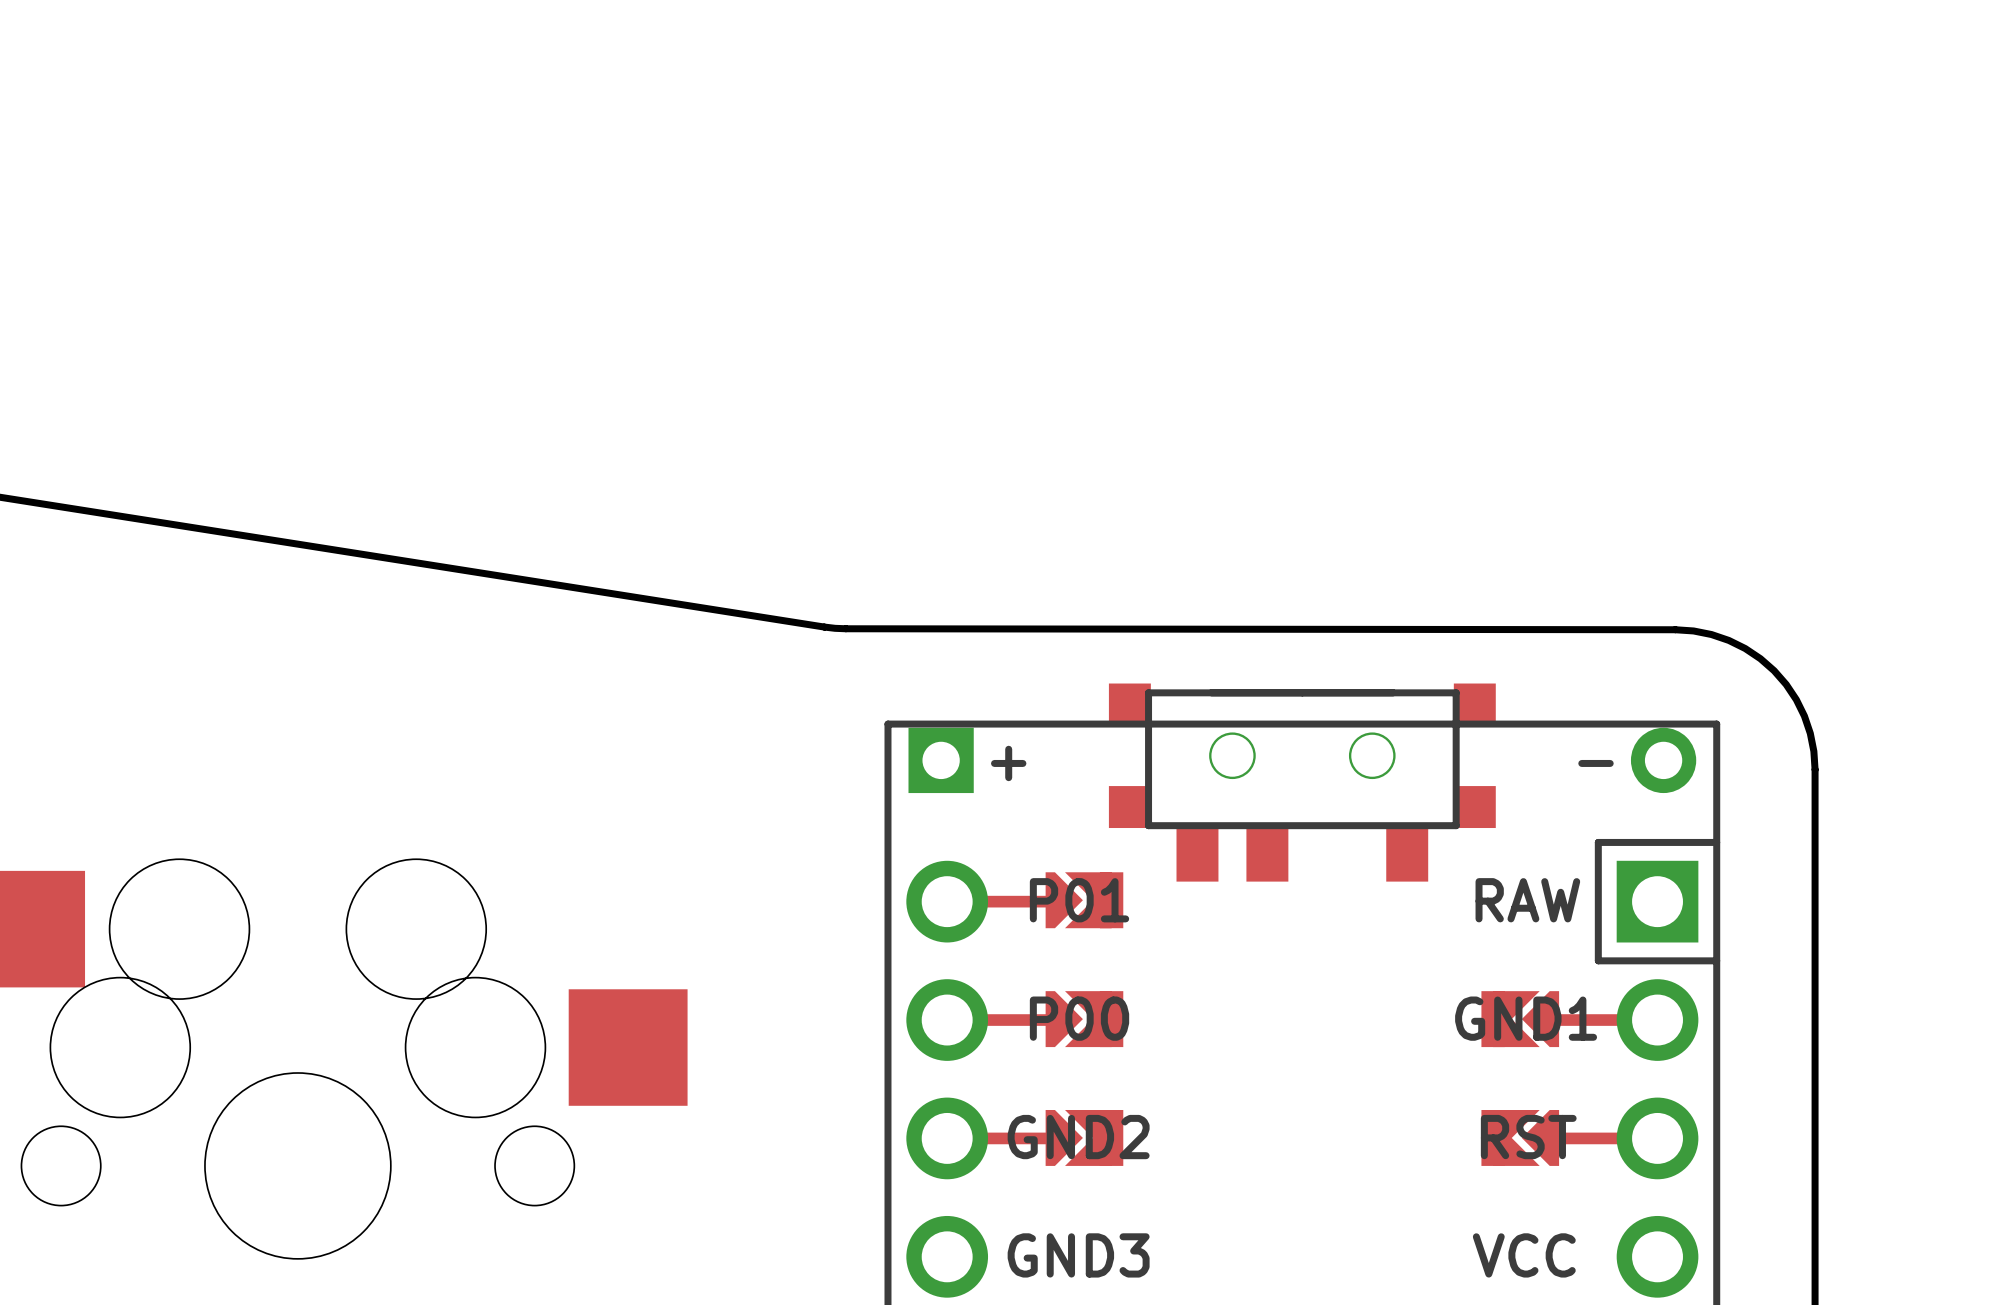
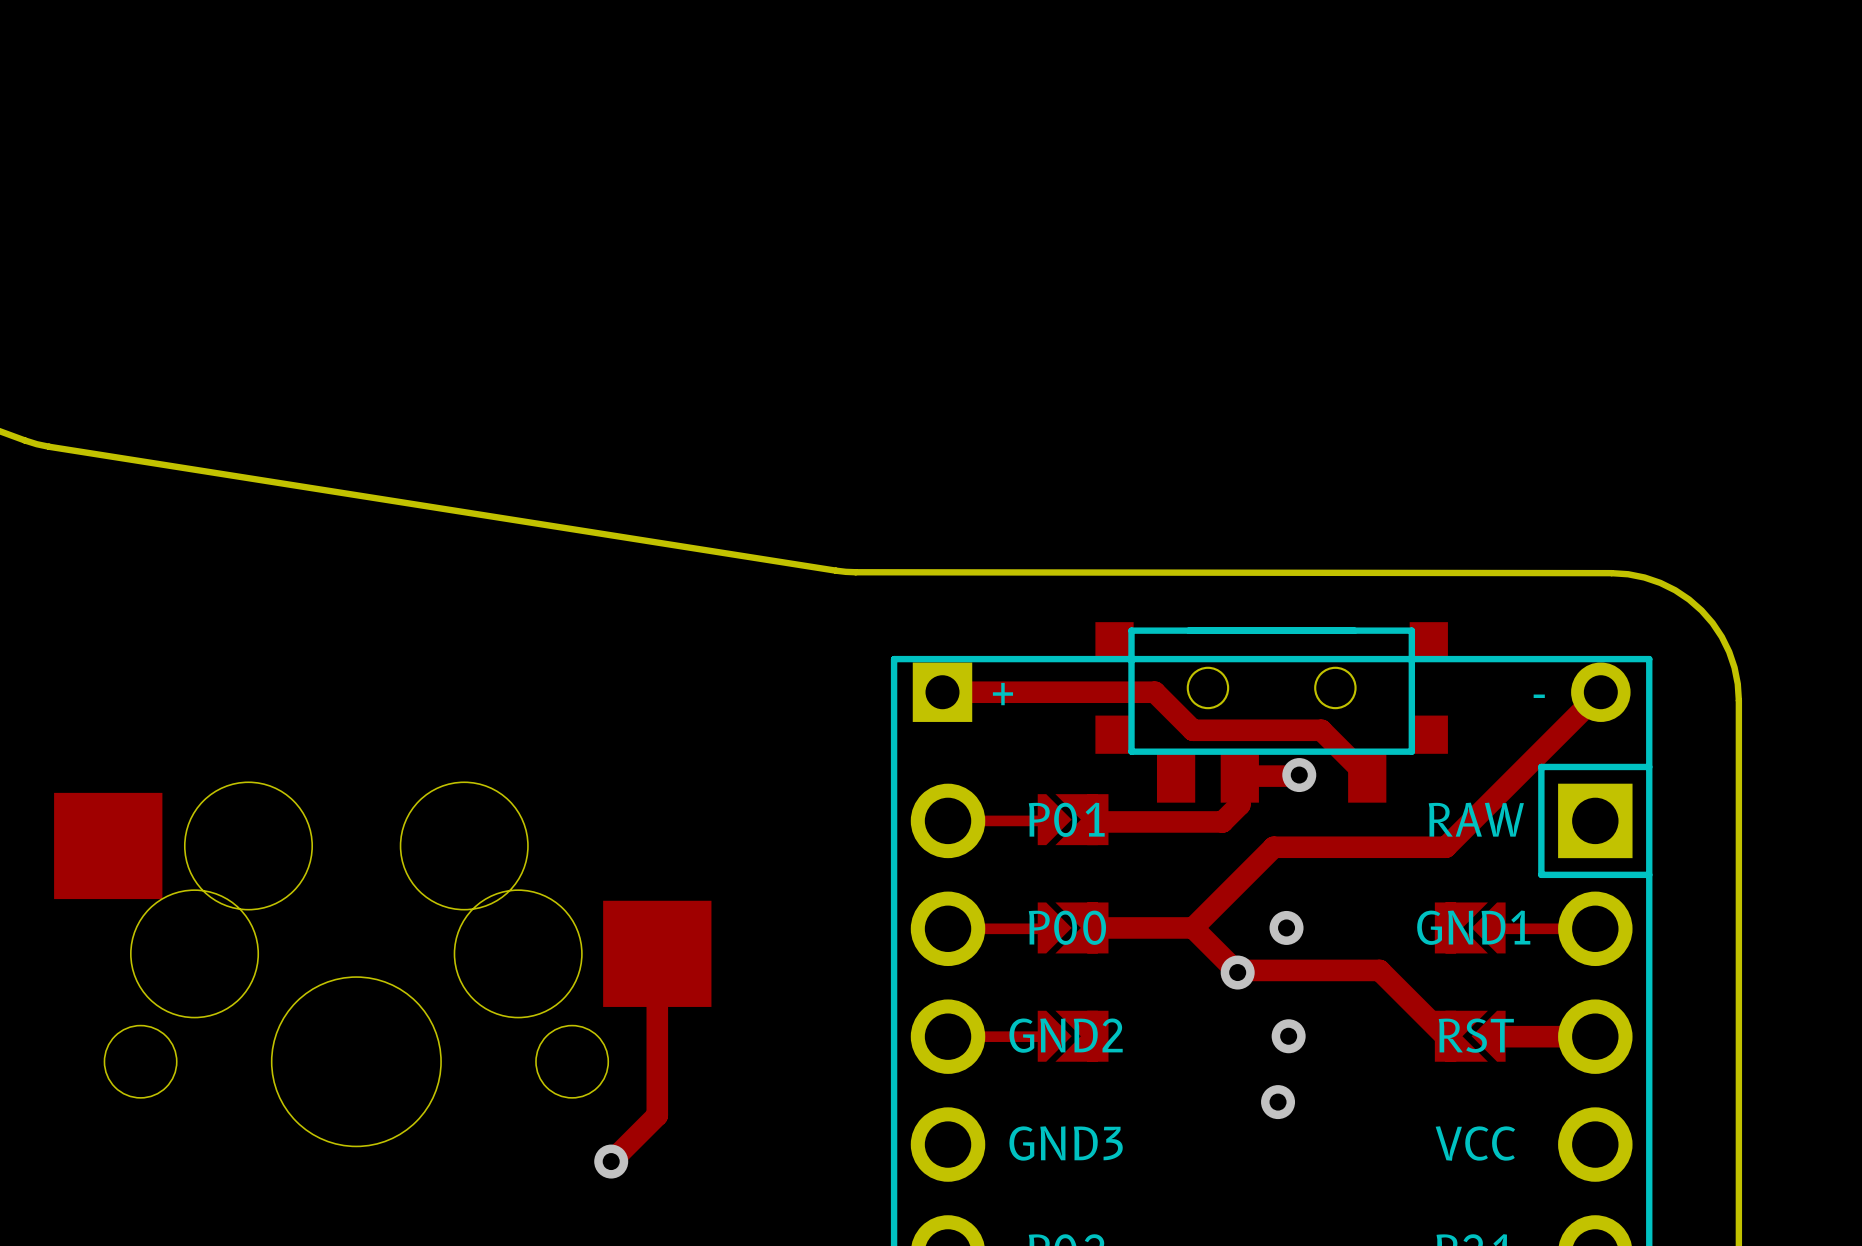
track: none -> (942, 692) (1154, 692) (1192, 730) (1321, 730) (1367, 776)
track: none -> (1600, 692) (1445, 847) (1273, 847) (1193, 927)
track: none -> (1299, 775) (1239, 776) (1239, 804) (1222, 821) (1100, 821) (1097, 819)
via: none -> (1299, 775)
track: none -> (1097, 927) (1193, 927)
track: none -> (1193, 927) (1235, 970) (1379, 970) (1445, 1036)
via: none -> (1286, 927)
track: none -> (657, 953) (657, 1115) (611, 1161)
via: none -> (1237, 972)
via: none -> (1288, 1036)
track width: thin (1540, 1138) (1657, 1138) -> thick (1489, 1036) (1595, 1036)
via: none -> (1278, 1102)
via: none -> (611, 1161)

